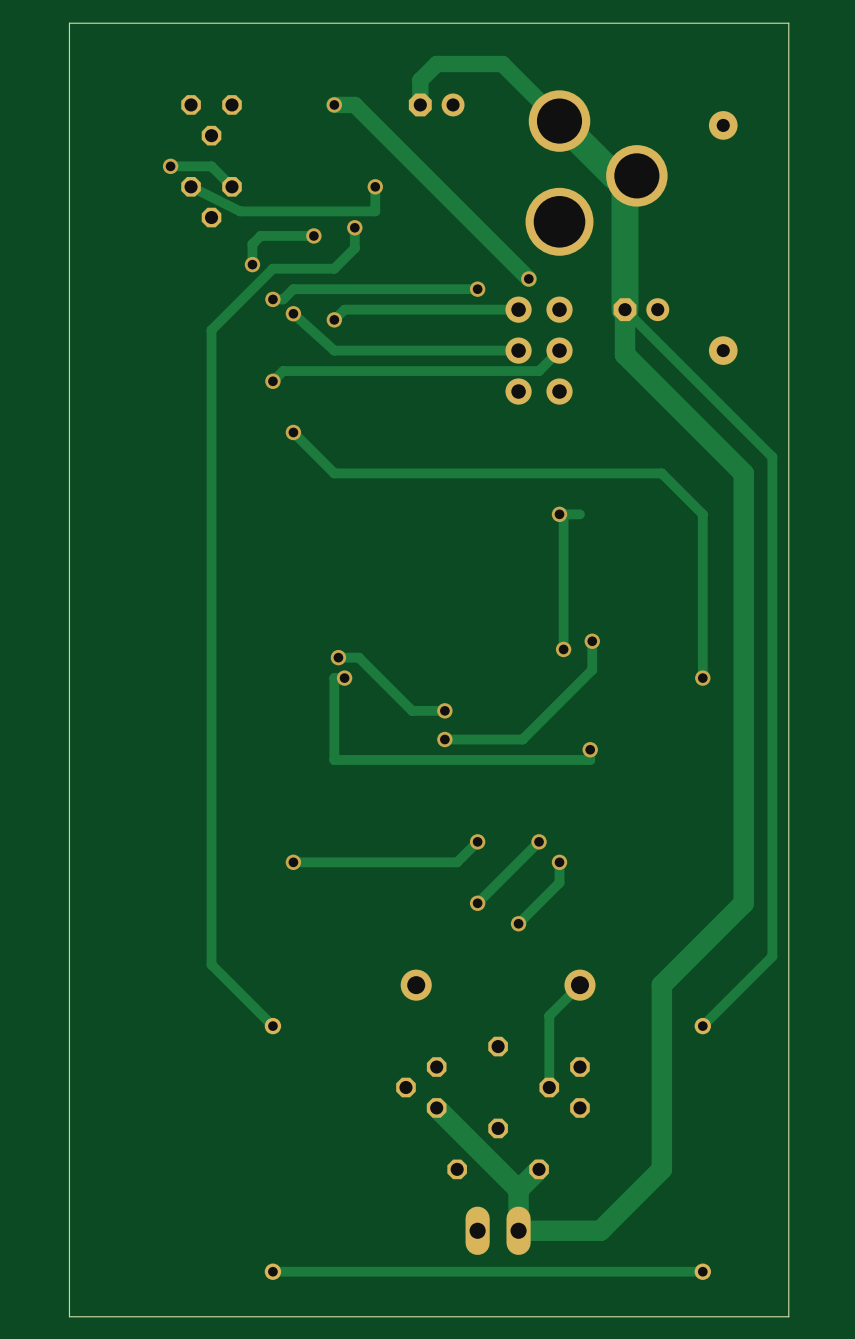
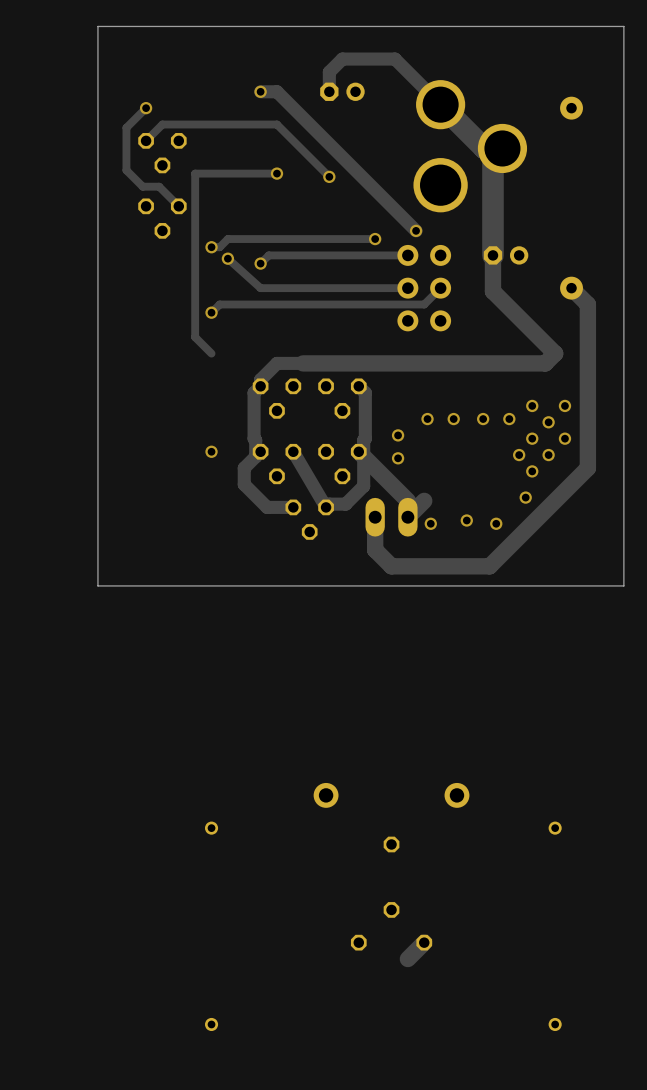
board edge: (130, 23) (69, 23) (69, 1316) (788, 1316) (788, 723) -> (97, 26) (97, 585) (623, 585)
part: (211, 120) -> none
track: none -> (146, 108) (126, 127) (126, 170) (142, 186) (159, 186) (178, 206)
track: (170, 166) (211, 166) (231, 186) -> none
via position: (170, 166) -> (146, 108)
track: none -> (146, 140) (162, 124) (276, 124) (329, 176)
track: (375, 186) (375, 211) (240, 211) (191, 186) -> none
via: (375, 186) -> none
part position: (211, 202) -> (162, 153)
via: none -> (276, 173)
via: none -> (329, 176)
track: (354, 227) (354, 248) (334, 268) (272, 268) (211, 330) (211, 964) (272, 1026) -> none
via: (354, 227) -> none
track: (313, 235) (260, 235) (252, 244) -> (276, 173) (195, 173) (195, 203)
via: (313, 235) -> none
part: none -> (162, 218)
track: none -> (195, 219) (195, 337) (211, 353)
via: (252, 264) -> none
track: (625, 309) (772, 457) (772, 956) (702, 1026) -> none
track: (293, 432) (334, 473) (661, 473) (702, 514) (702, 678) -> none
via: (293, 432) -> none
track: (702, 432) (743, 473) -> (571, 288) (587, 304) (587, 386)
track: none -> (555, 353) (545, 363) (276, 363) (260, 379) (260, 386) (254, 392) (255, 456)
track: none -> (358, 386) (365, 392) (363, 486) (345, 504) (329, 504) (326, 507) (293, 451)
part: none -> (276, 398)
part: none -> (342, 398)
via: none -> (532, 405)
via: none -> (564, 405)
via: none -> (427, 419)
via: (559, 514) -> none
track: (563, 514) (563, 649) -> none
via: none -> (453, 419)
track: (579, 514) (559, 514) -> none
via: none -> (483, 419)
via: none -> (509, 419)
via: none -> (548, 422)
via: none -> (398, 435)
via: none -> (532, 438)
via: none -> (564, 438)
via: none -> (211, 451)
track: none -> (260, 451) (244, 468) (244, 484) (267, 507) (293, 507)
via: none -> (519, 455)
via: none -> (548, 455)
track: none -> (363, 456) (358, 451) (407, 500)
via: none -> (398, 458)
part: none -> (276, 464)
part: none -> (342, 464)
track: (743, 575) (743, 903) (661, 985) (661, 1169) (600, 1230) (518, 1230) (518, 1189) (436, 1107) -> (587, 468) (489, 566) (391, 566) (375, 549) (375, 517)
via: none -> (532, 471)
via: none -> (525, 497)
track: none -> (424, 500) (407, 517)
part: none -> (391, 517)
part: none -> (309, 519)
track: (592, 641) (592, 669) (522, 739) (444, 739) -> none
via: none -> (496, 523)
via position: (563, 649) -> (430, 523)
track: (338, 657) (358, 657) (412, 710) (444, 710) -> none
via: (338, 657) -> none
track: (344, 678) (334, 678) (334, 759) (590, 759) (590, 749) -> none
via: (344, 678) -> none
via: (702, 678) -> none
via: (444, 710) -> none
via: (444, 739) -> none
via: (590, 749) -> none
track: (477, 841) (457, 862) (293, 862) -> none
via: (477, 841) -> none
track: (539, 841) (477, 903) -> none
via: (539, 841) -> none
via: (293, 862) -> none
track: (559, 862) (559, 882) (518, 923) -> none
via: (559, 862) -> none
via: (477, 903) -> none
via: (518, 923) -> none
track: (579, 985) (549, 1015) (549, 1087) -> none
part: (421, 1087) -> none
part: (564, 1087) -> none
part: (498, 1230) -> none
track: (702, 1271) (272, 1271) -> none

